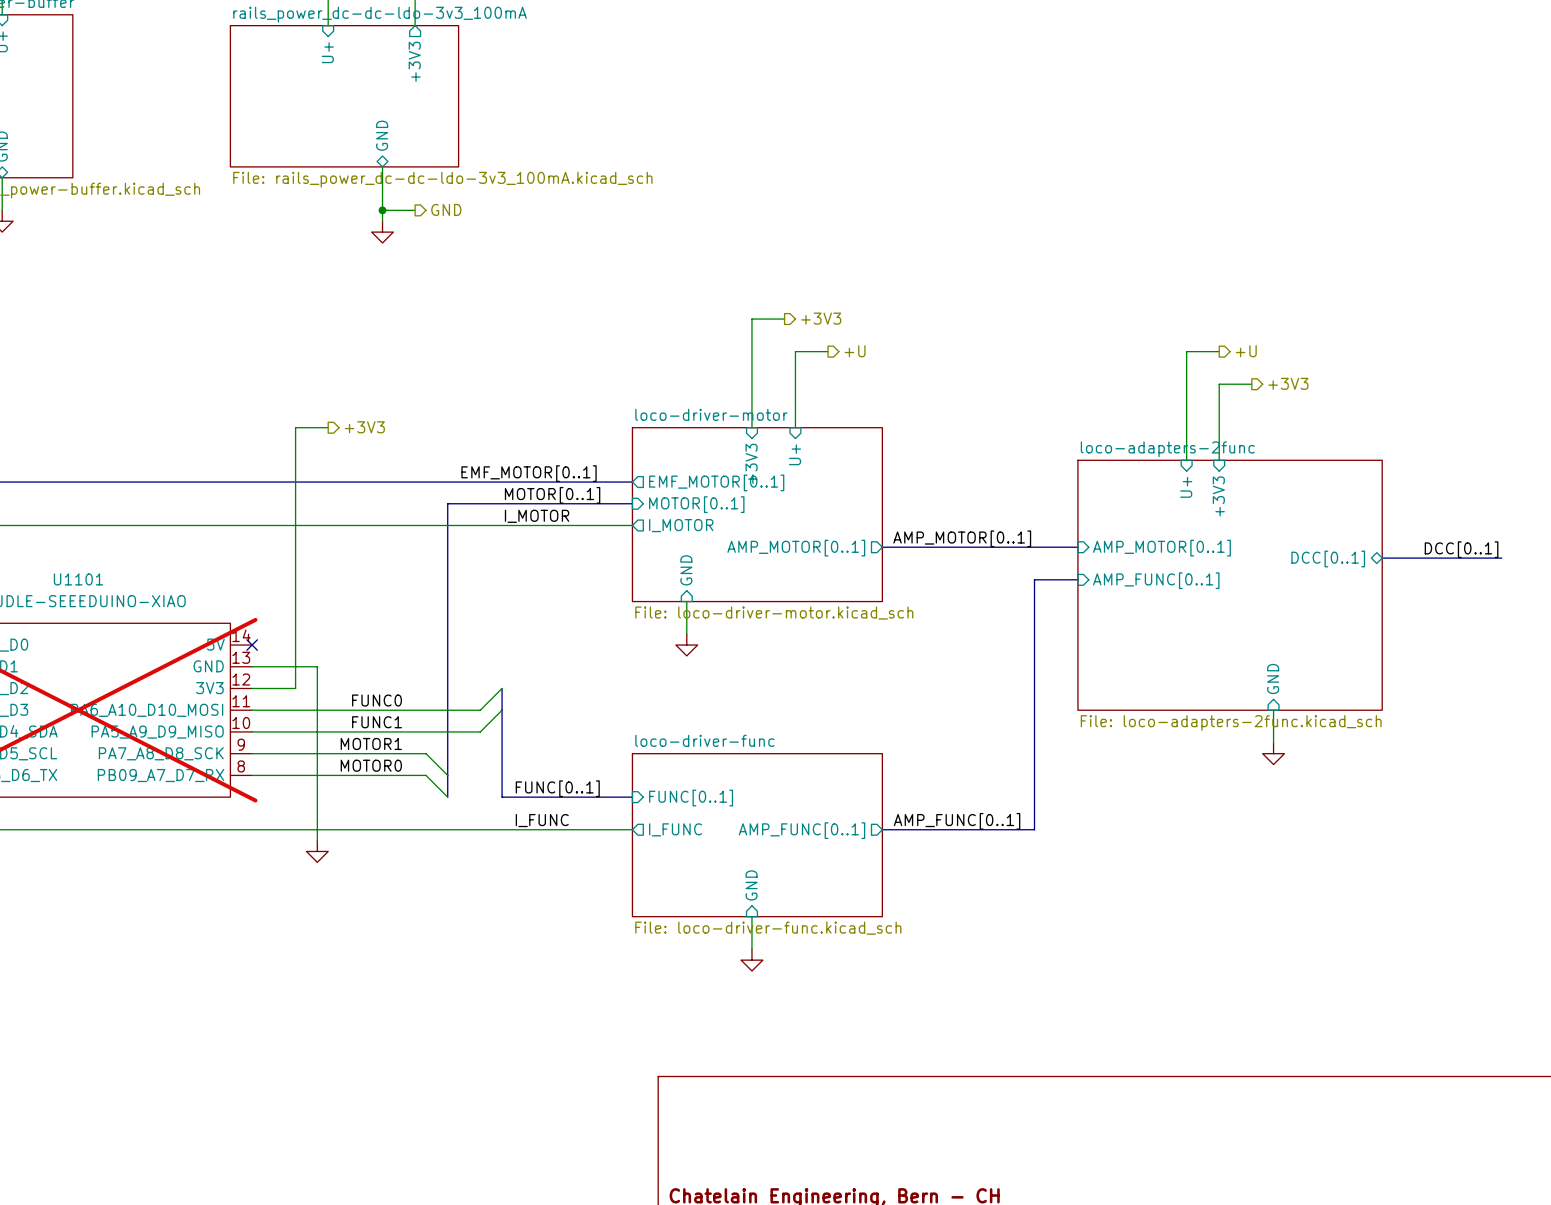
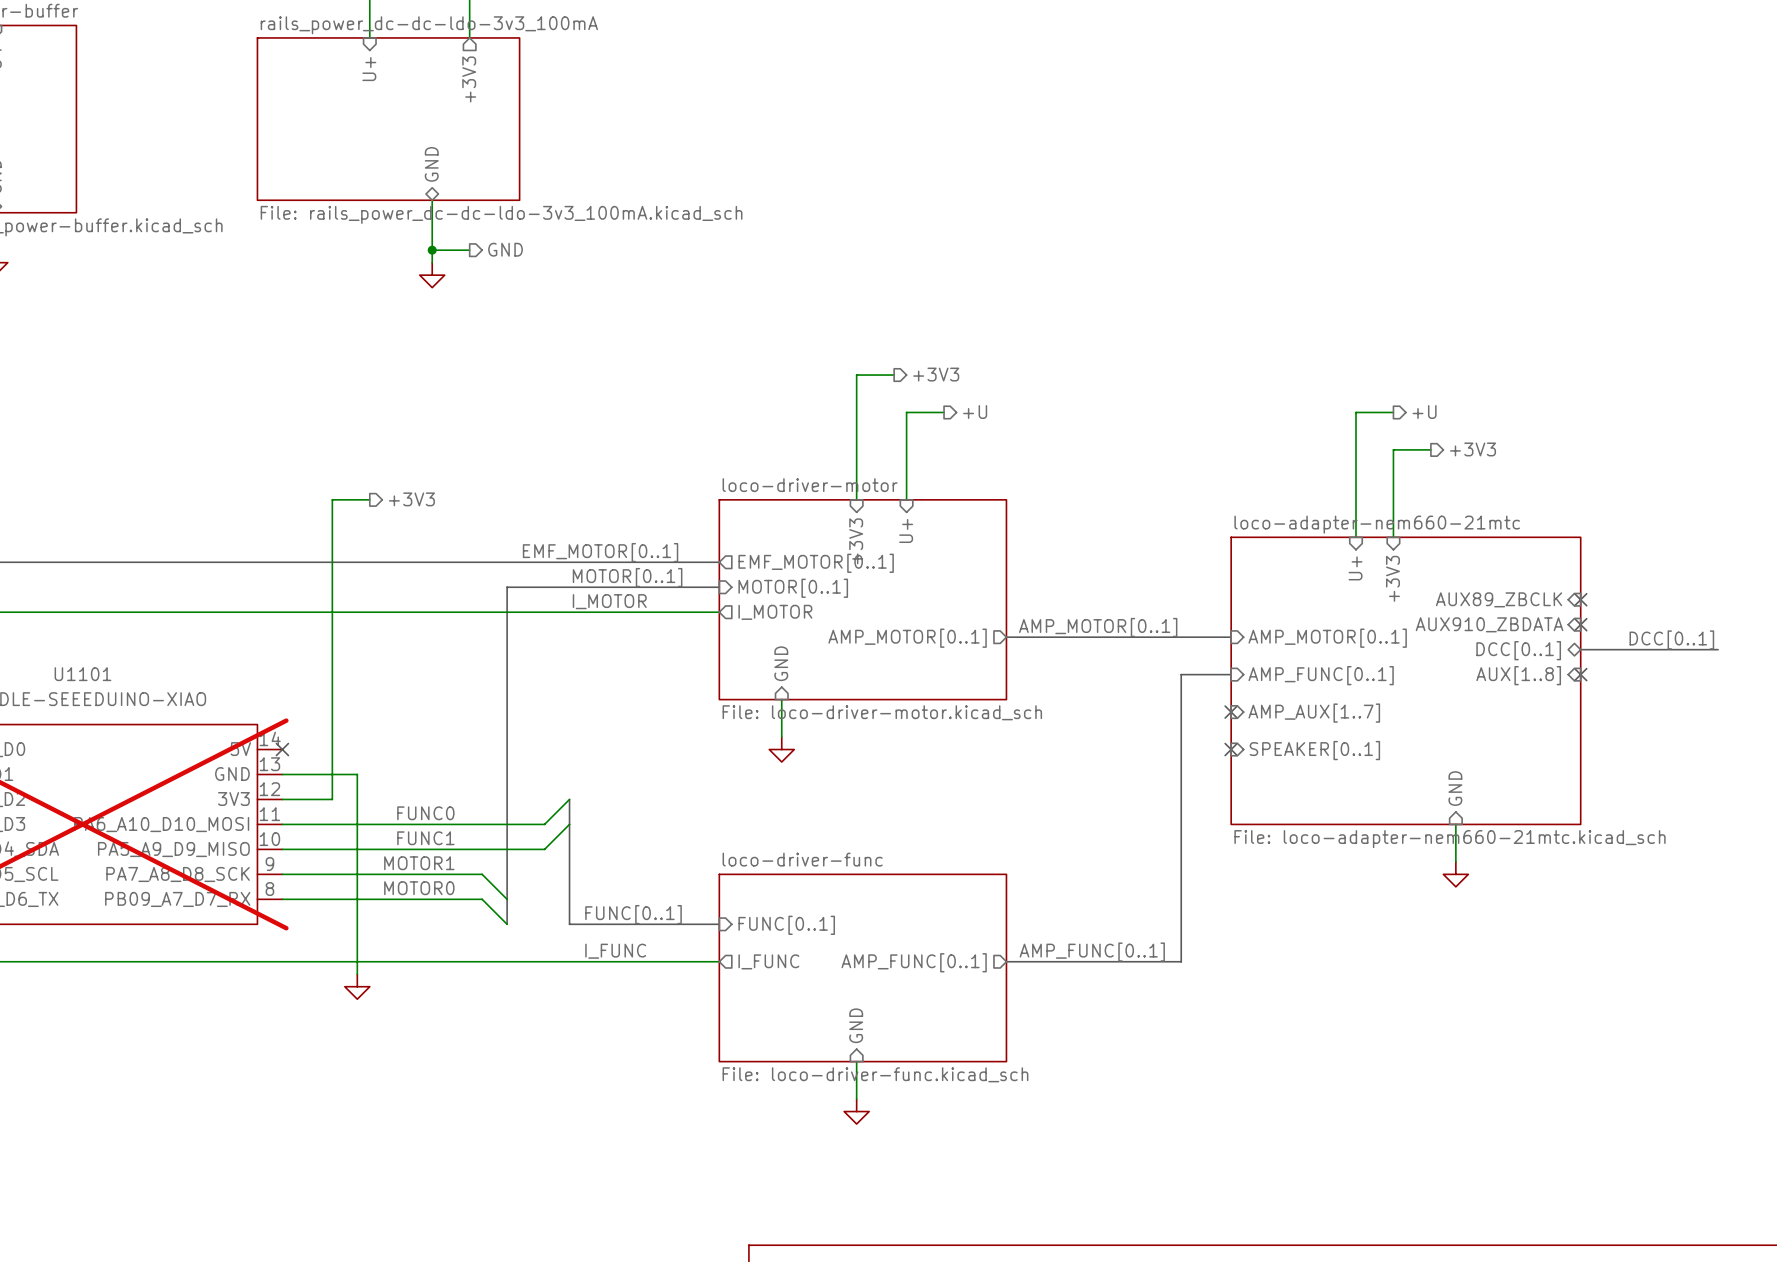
sheet loco-adapters-2func name: loco-adapters-2func (1167, 449) -> loco-adapter-nem660-21mtc (1377, 524)
sheet pin: none -> AUX89_ZBCLK (1499, 599)
no-connect mark: none -> (1580, 599)
sheet pin: none -> AUX910_ZBDATA (1489, 624)
no-connect mark: none -> (1580, 624)
no-connect mark: none -> (1580, 674)
sheet pin: none -> AUX[1..8] (1518, 675)
no-connect mark: none -> (1231, 712)
sheet pin: none -> AMP_AUX[1..7] (1314, 713)
no-connect mark: none -> (1231, 749)
sheet pin: none -> SPEAKER[0..1] (1314, 750)
sheet loco-adapters-2func value: File: loco-adapters-2func.kicad_sch (1231, 722) -> File: loco-adapter-nem660-21mtc.kicad_sch (1450, 839)

